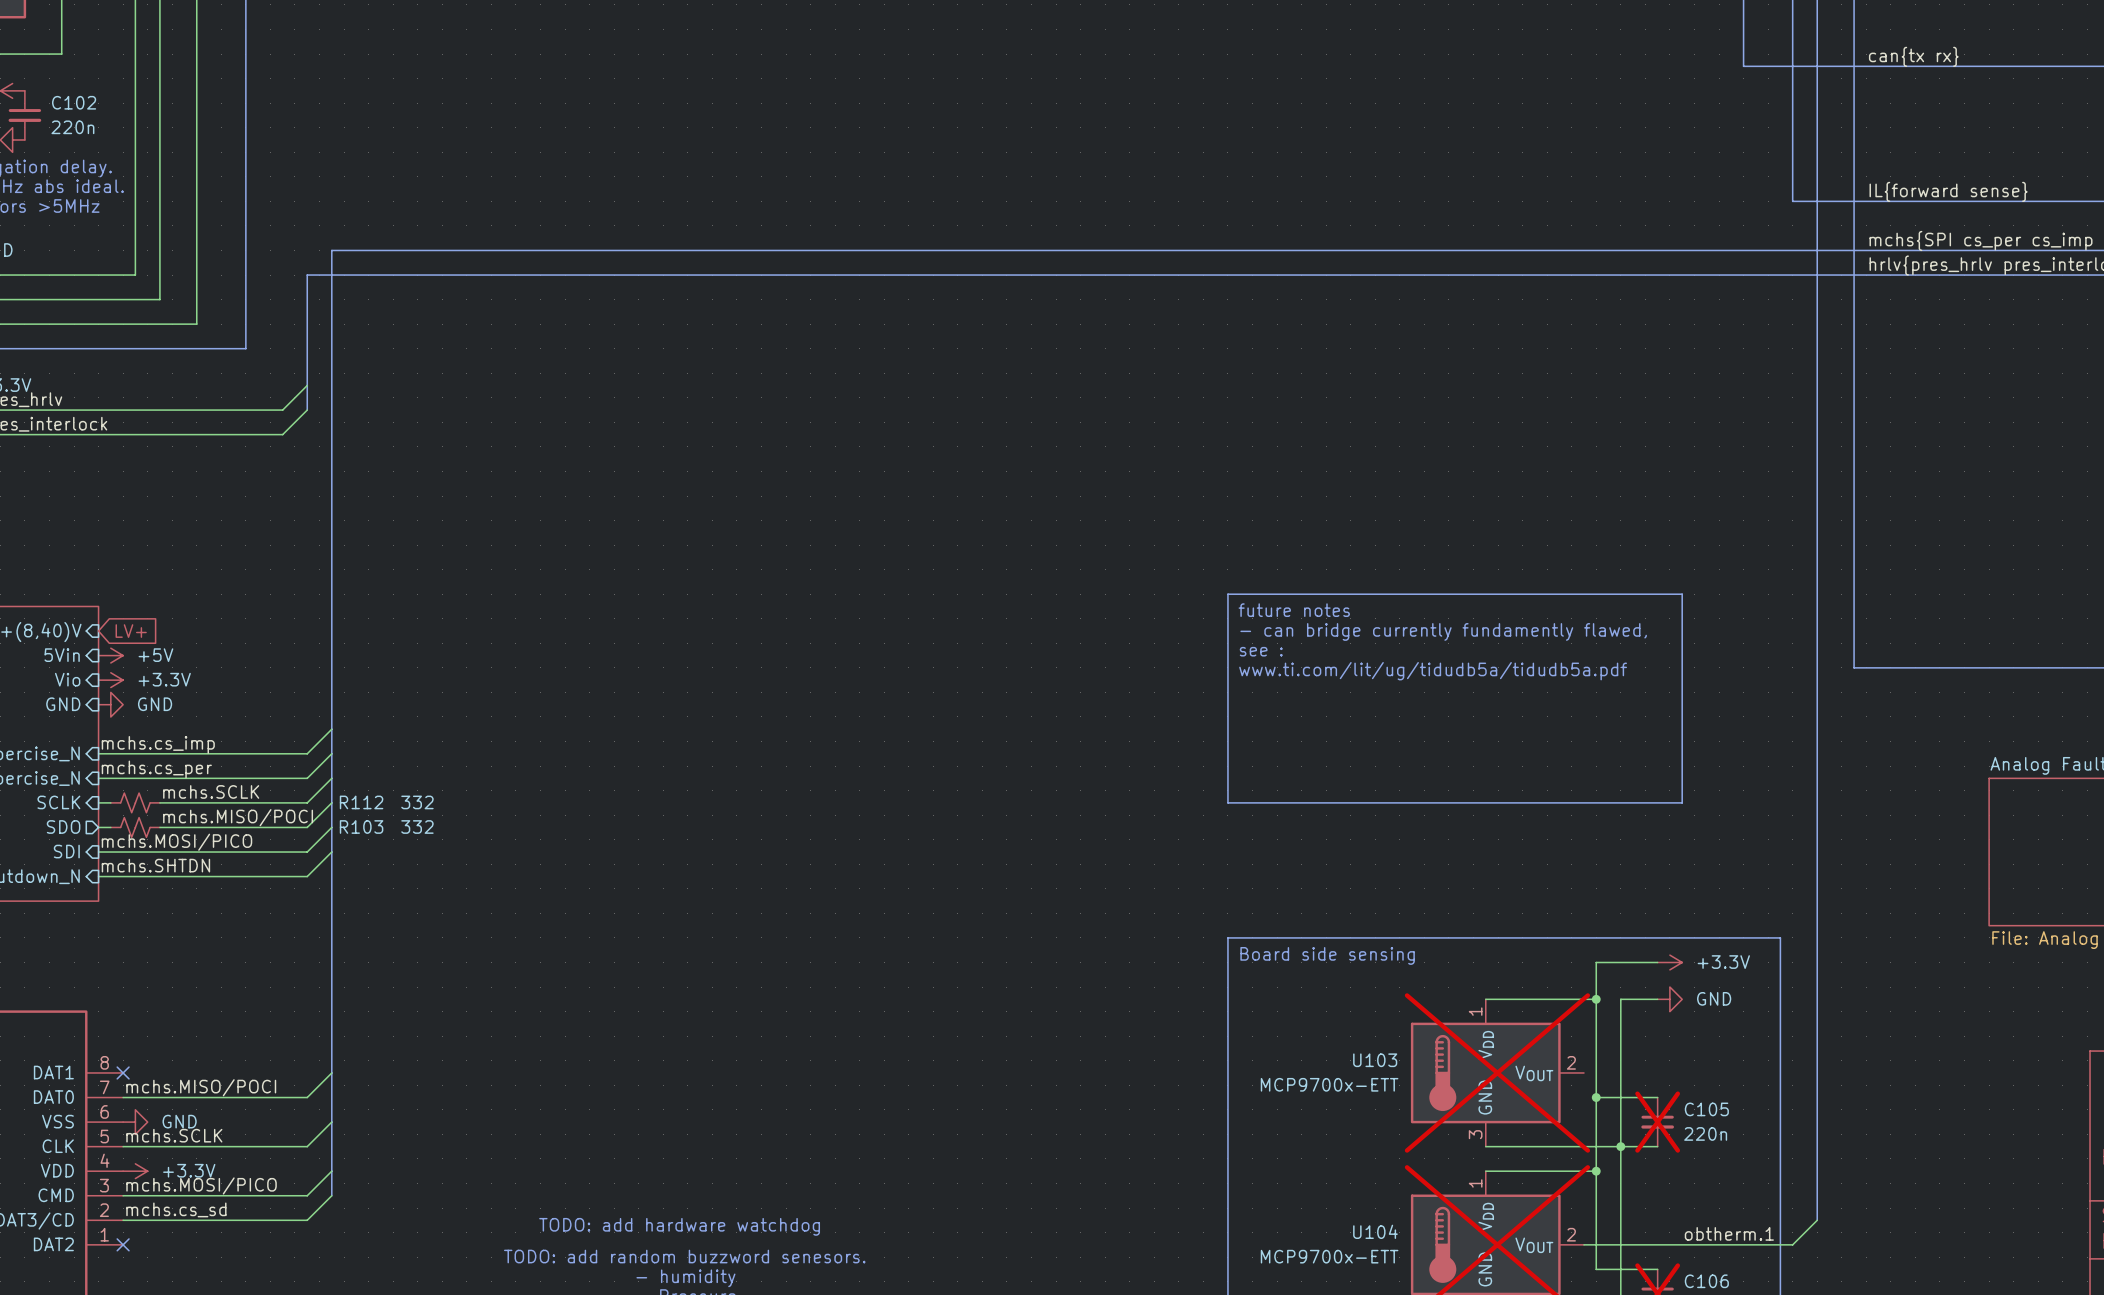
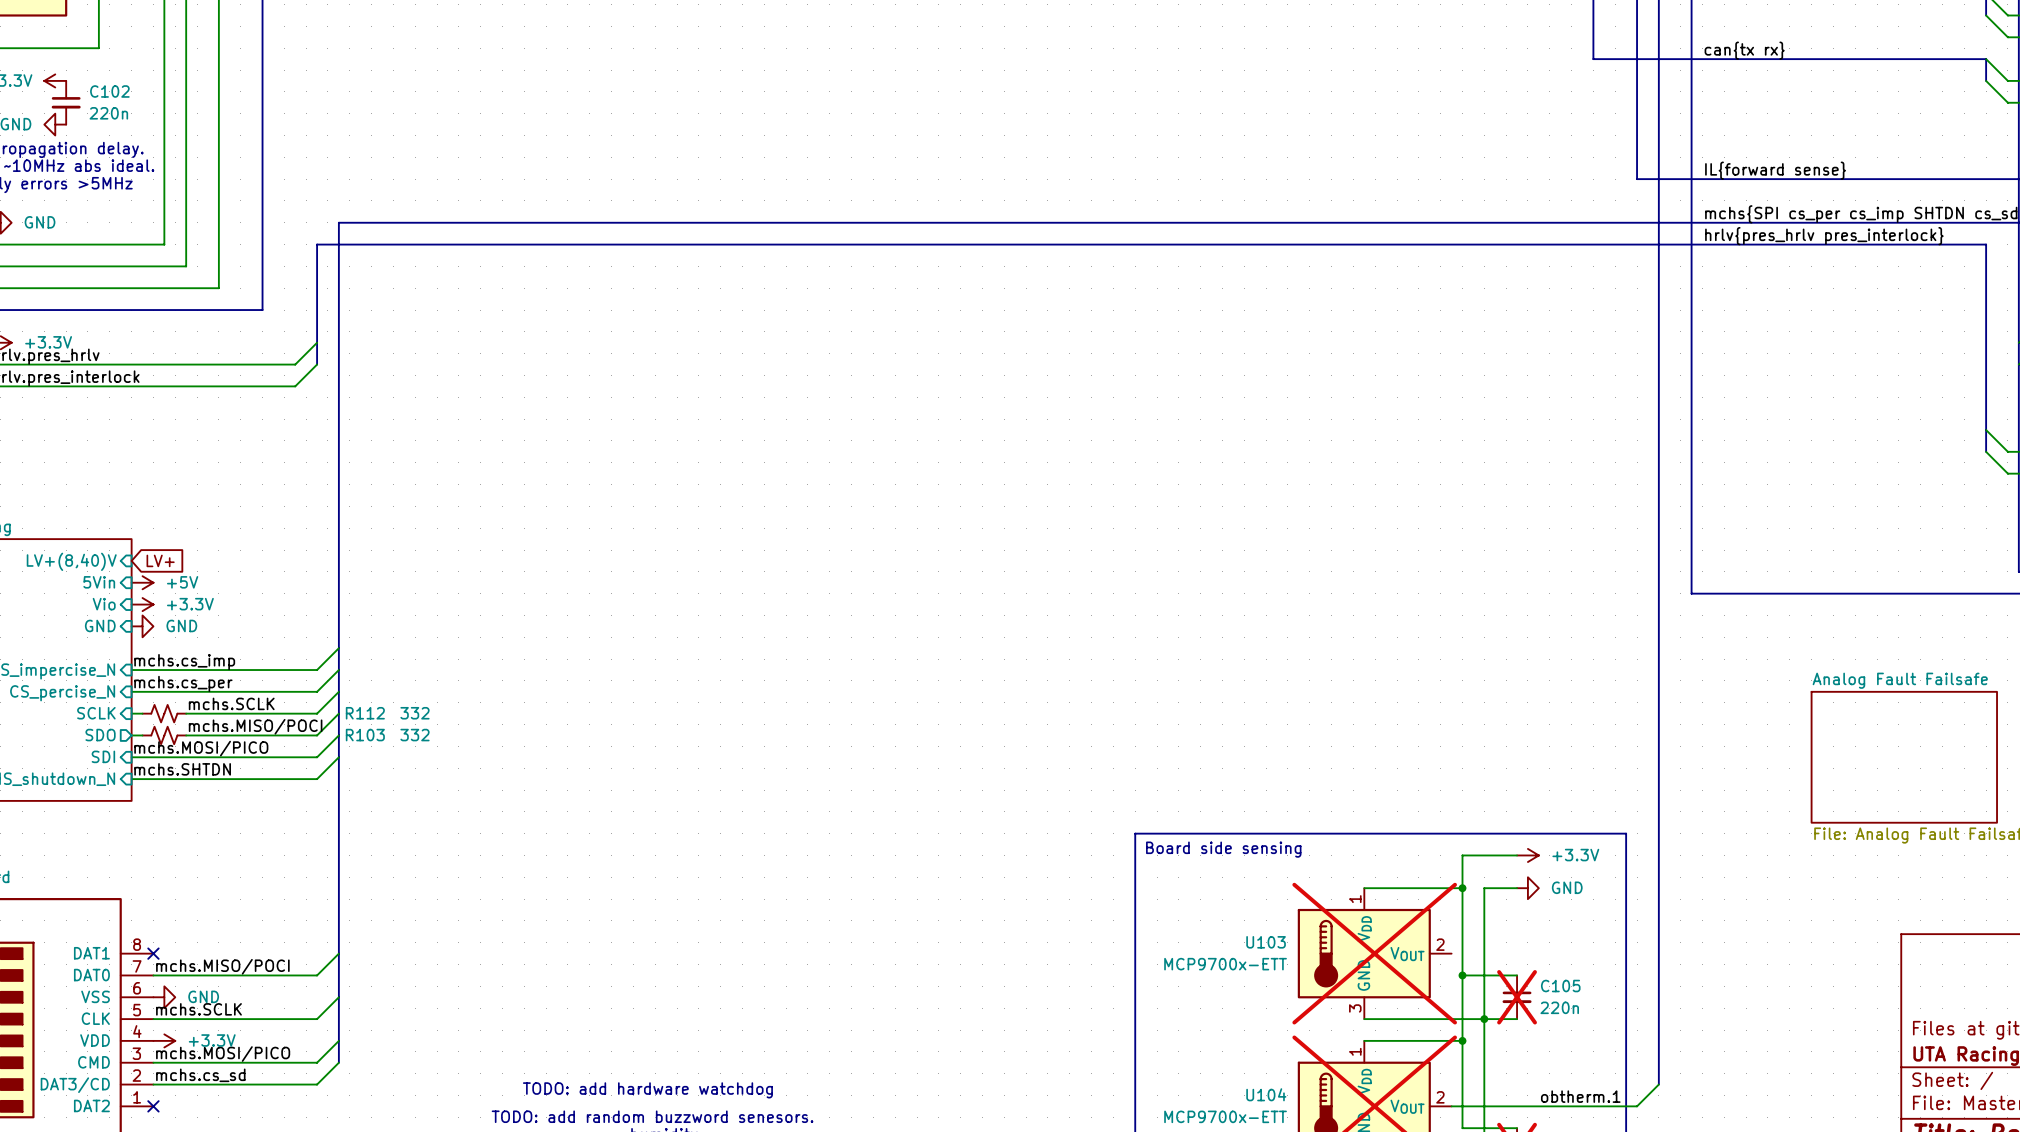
line: (1227, 594) (1682, 594) (1682, 802) (1227, 802) (1227, 594) -> none
text: future notes (1294, 610) -> none
text: - can bridge currently fundamently flawed, (1443, 631) -> none
text: see : (1261, 651) -> none
text: www.ti.com/lit/ug/tidudb5a/tidudb5a.pdf (1433, 671) -> none

